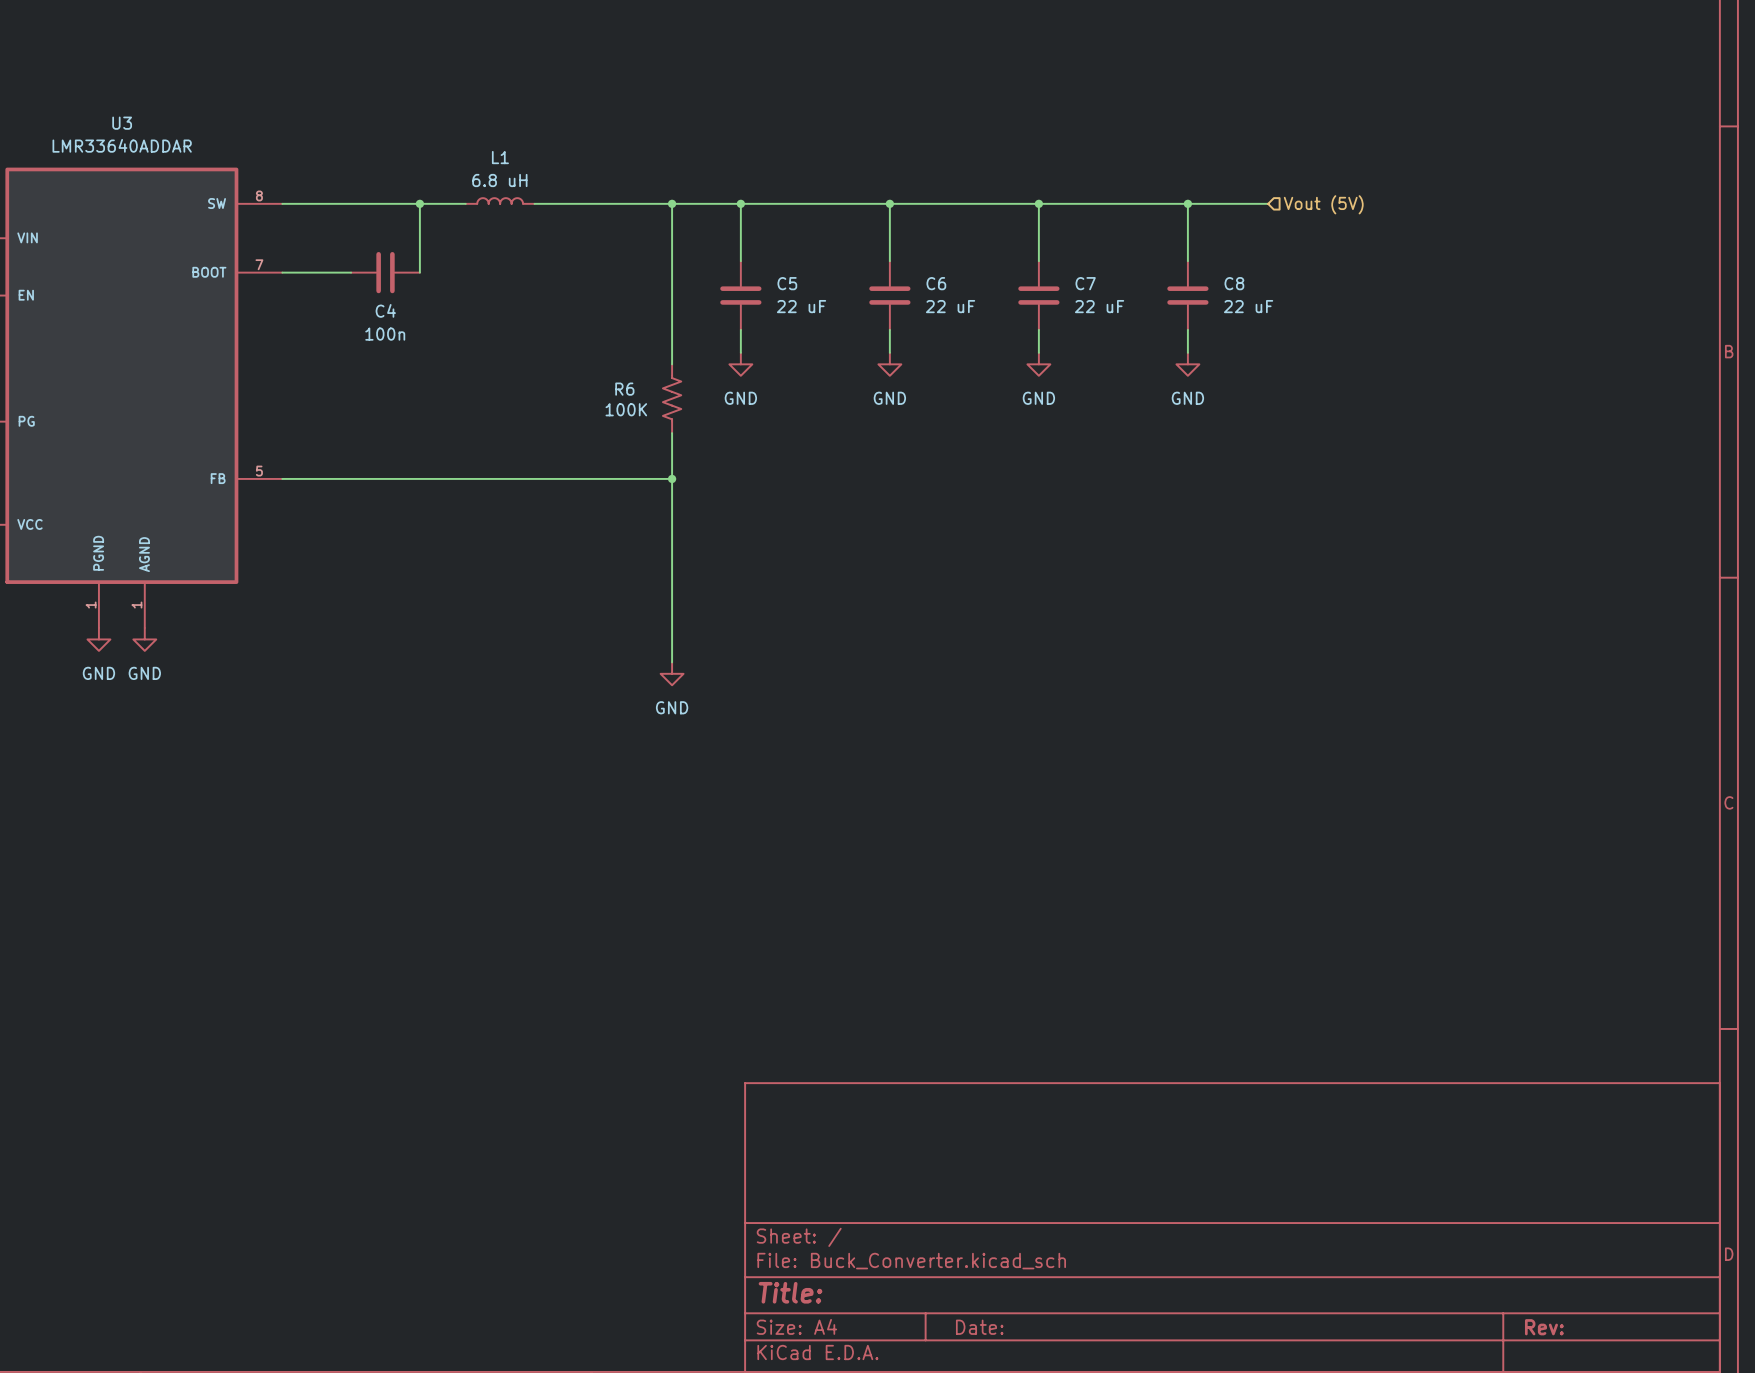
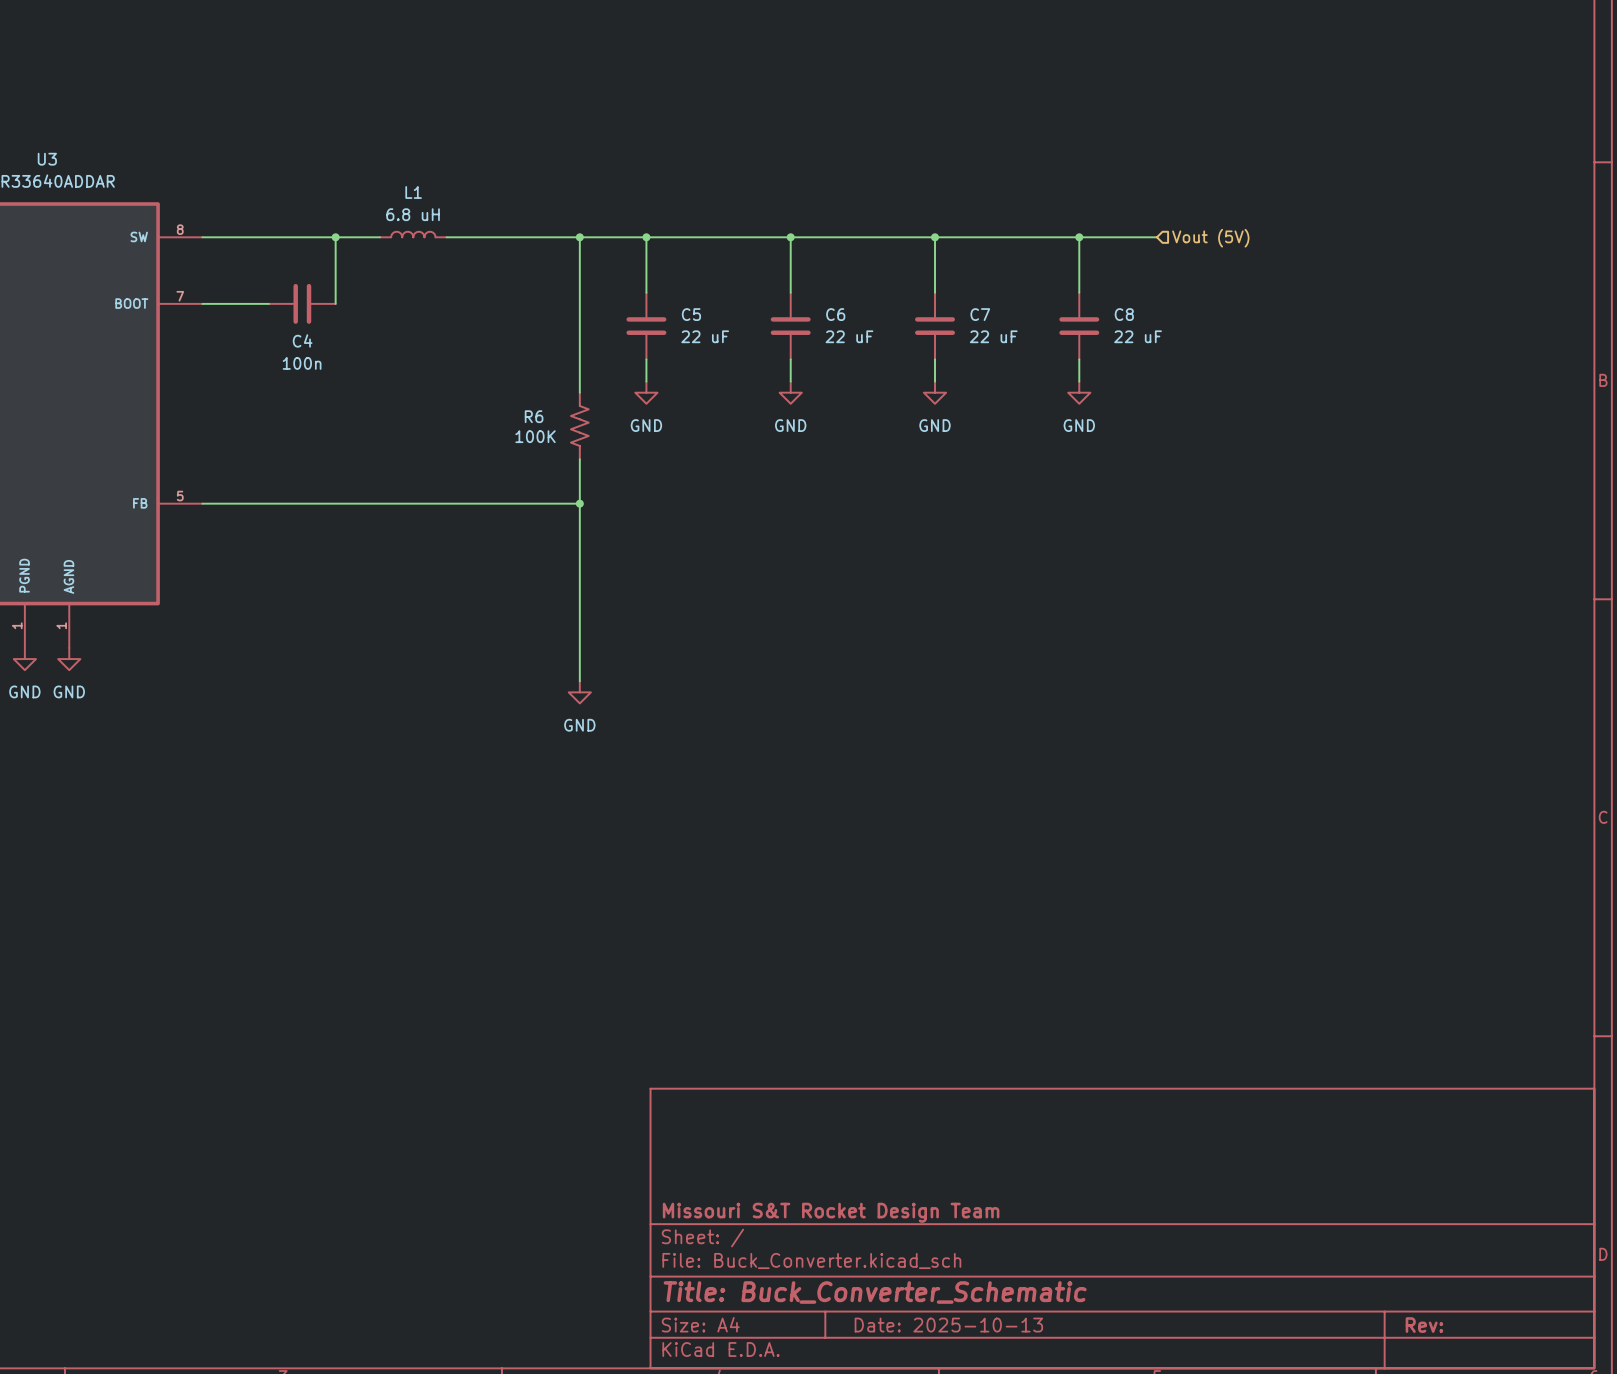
title block: none -> Missouri S&T Rocket Design Team (831, 1212)
title block: Title: (790, 1292) -> Title: Buck_Converter_Schematic (875, 1292)
title block: Date: (979, 1327) -> Date: 2025-10-13 (948, 1325)

